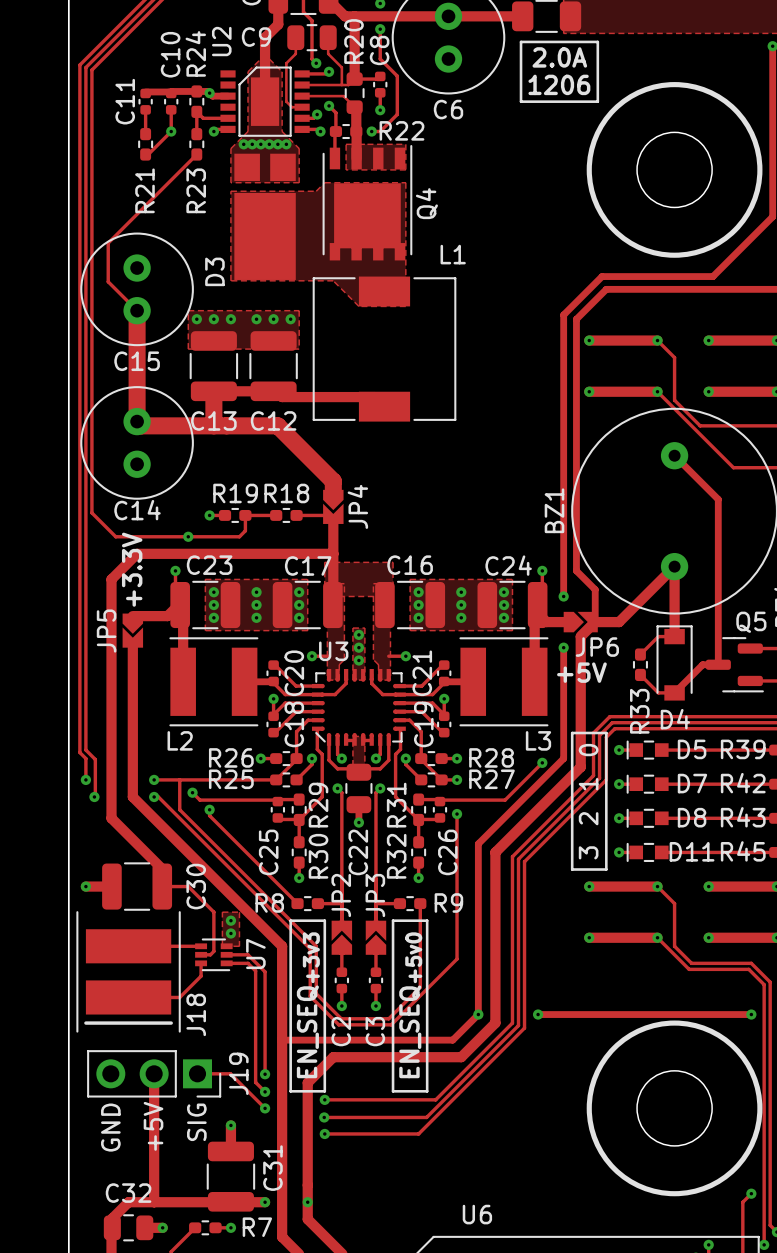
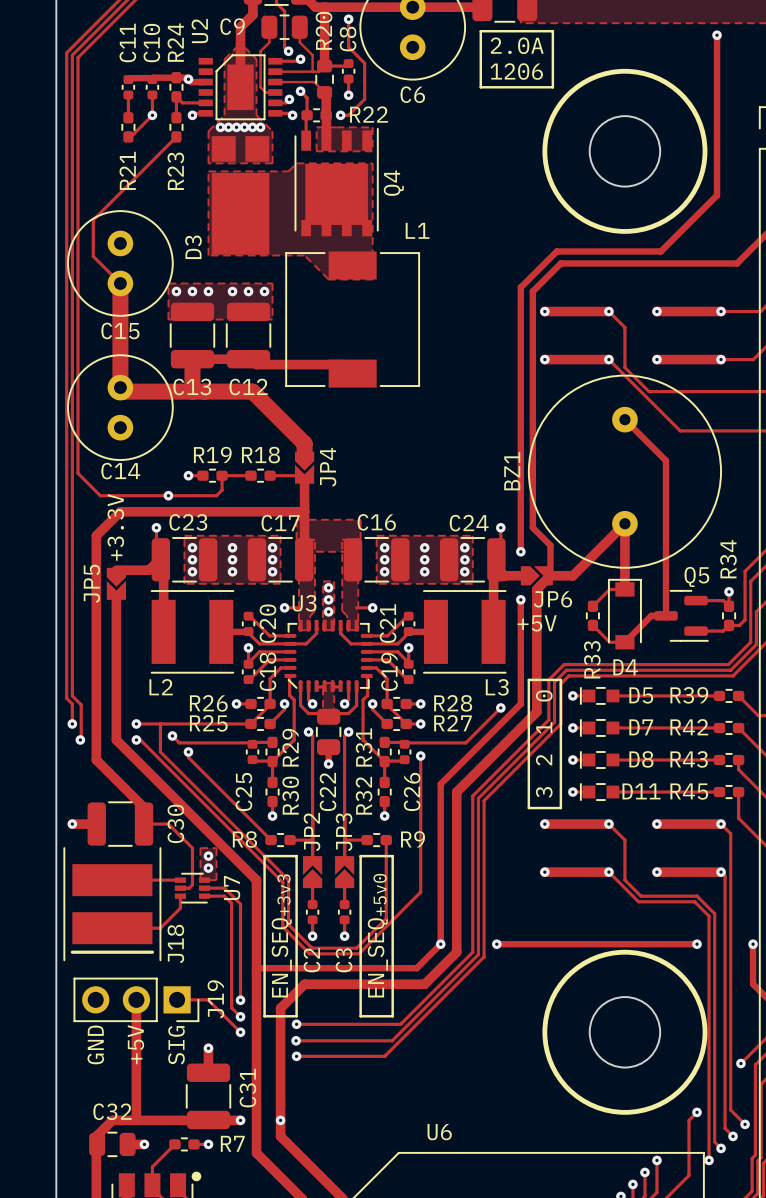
C11 name position: C11 (125, 101) -> C11 (127, 42)

